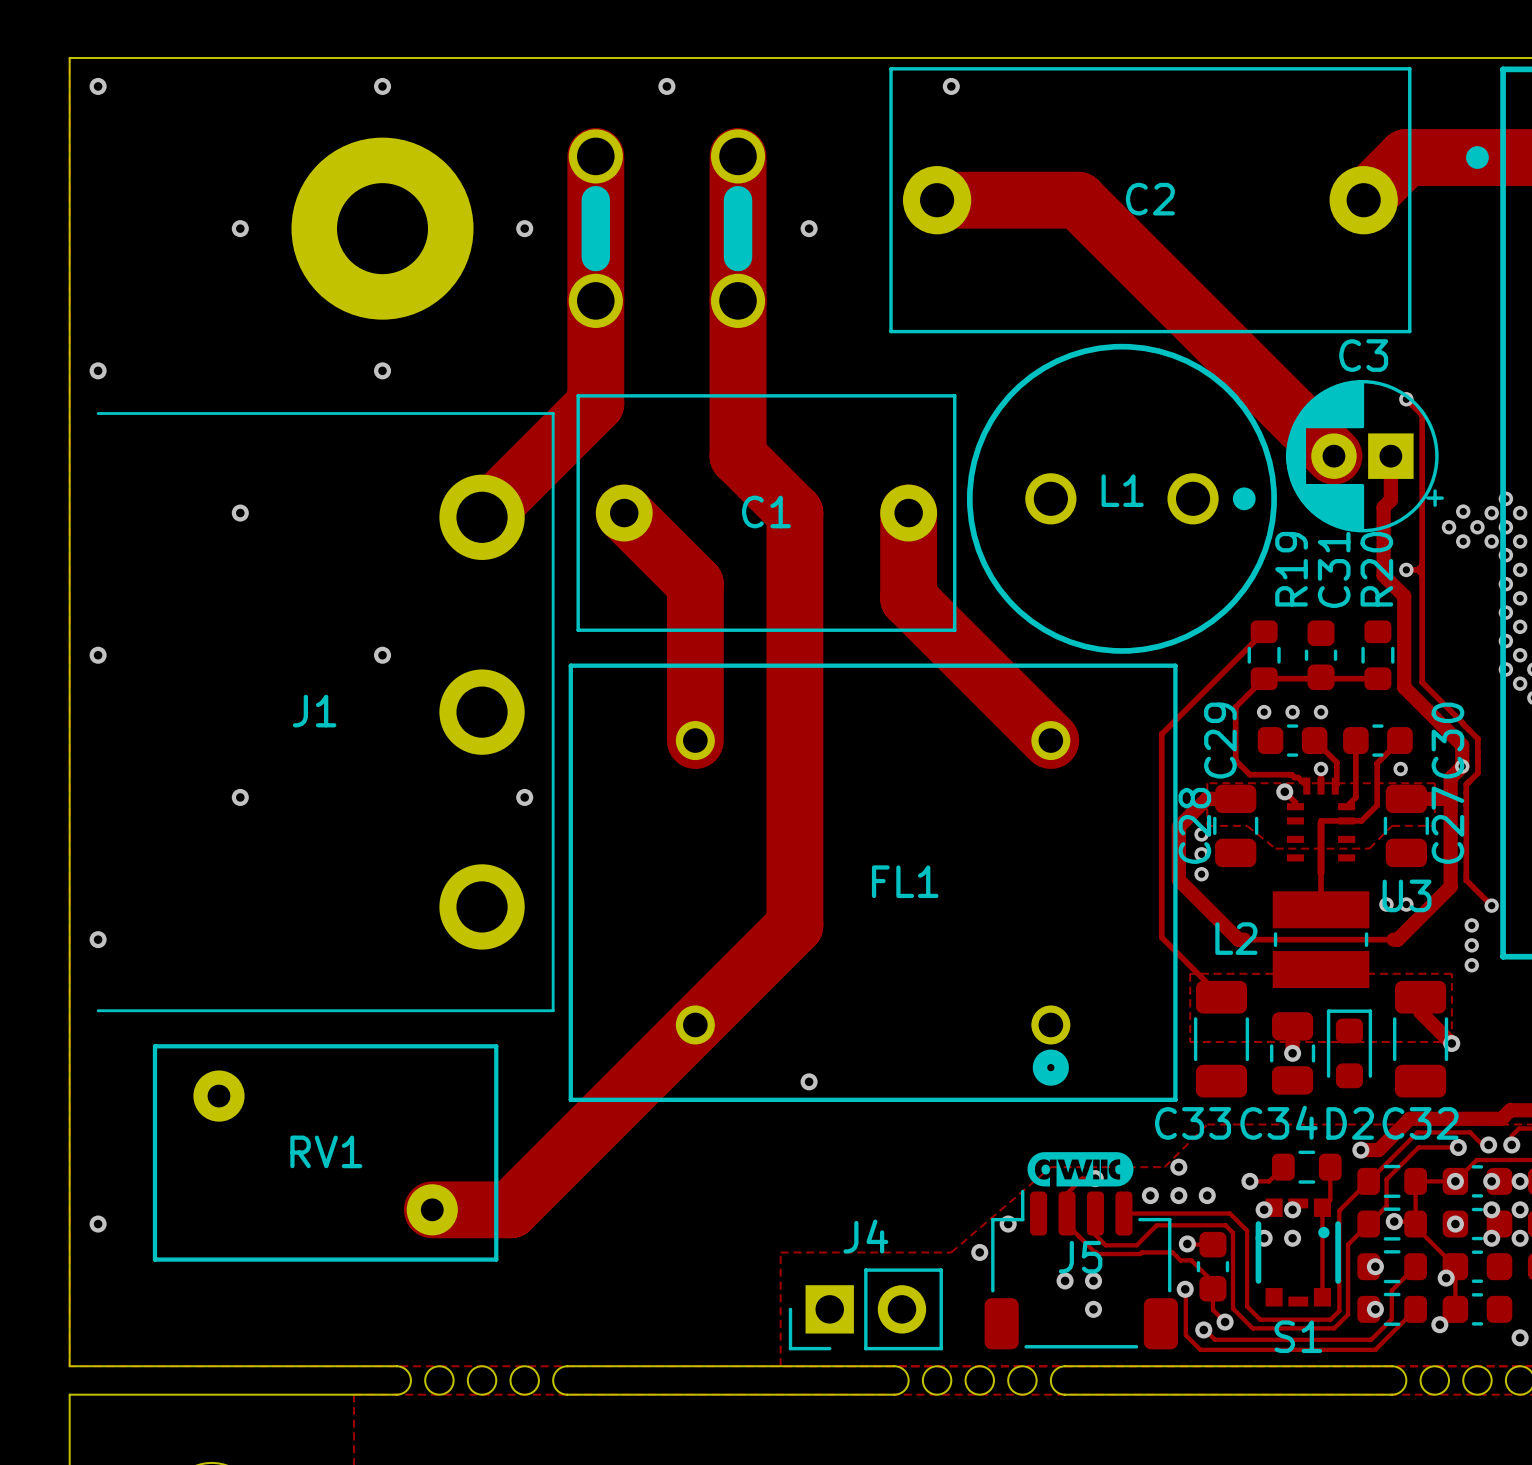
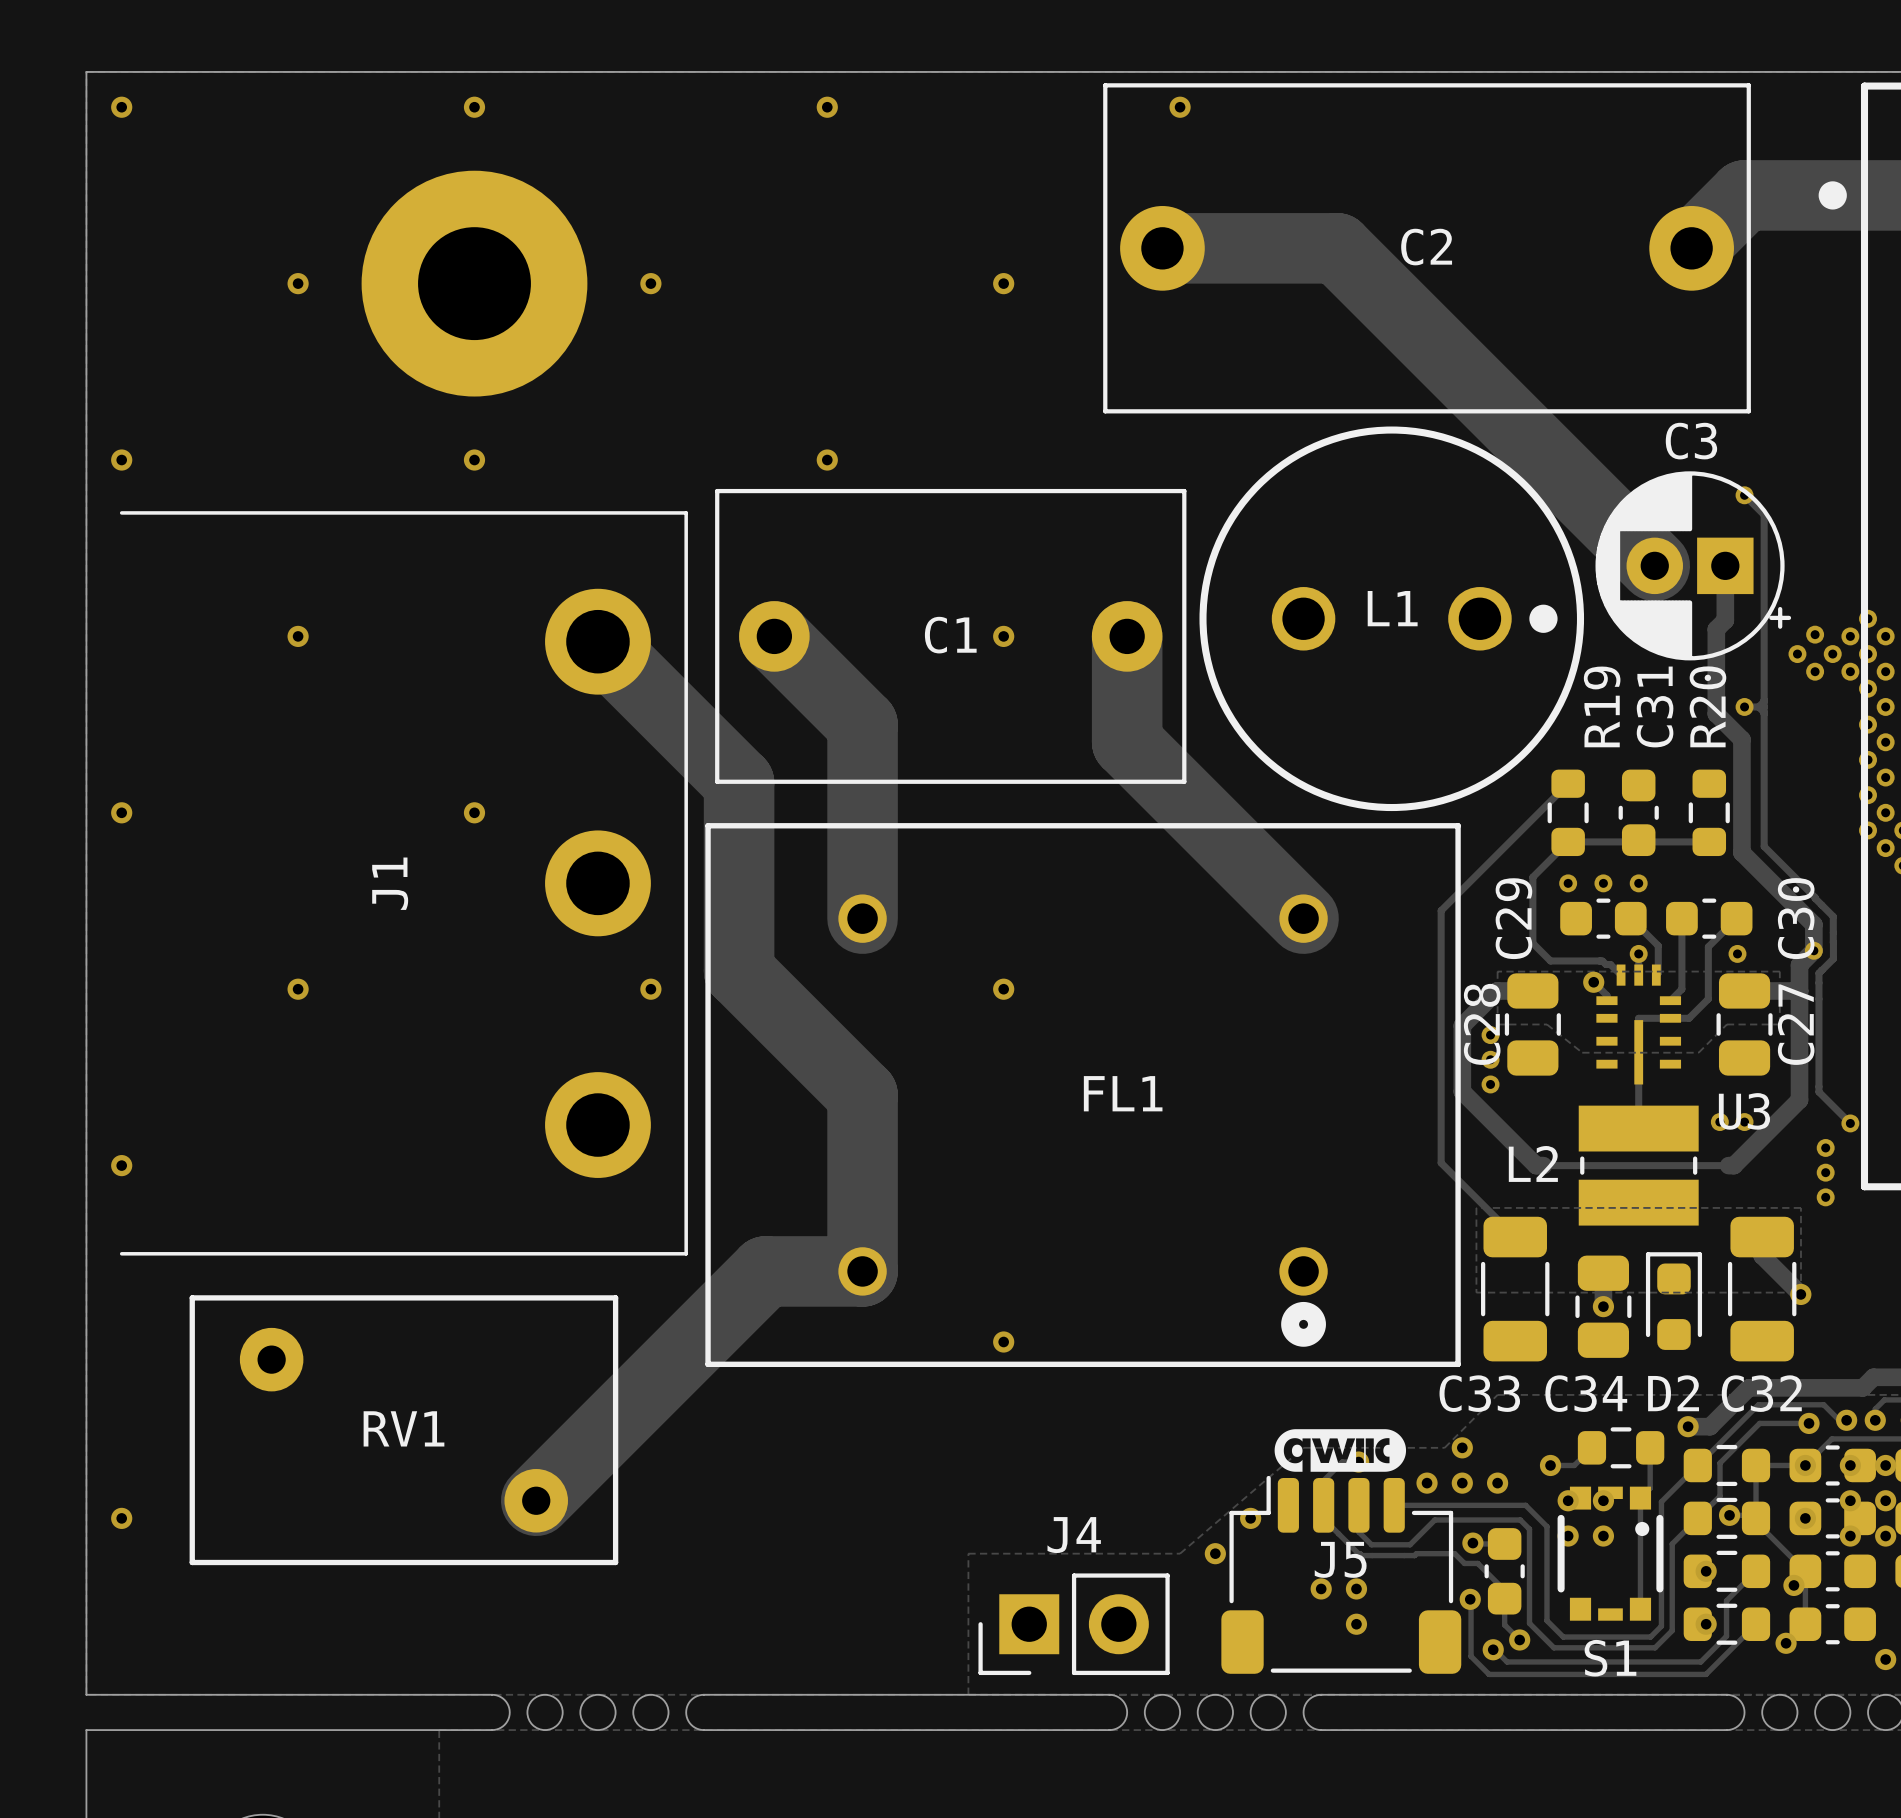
track: (595, 156) (595, 403) (482, 517) -> none
track: (738, 156) (738, 456) (794, 513) (794, 925) (510, 1209) (432, 1209) -> (597, 641) (739, 782) (739, 971) (862, 1095) (862, 1271) (765, 1271) (536, 1500)
part: (595, 228) -> none
part: (738, 228) -> none
via: none -> (827, 460)
via: none -> (1003, 636)
J1 name rotation: 0° (314, 711) -> 90° counterclockwise (390, 883)
via: none -> (1003, 989)

